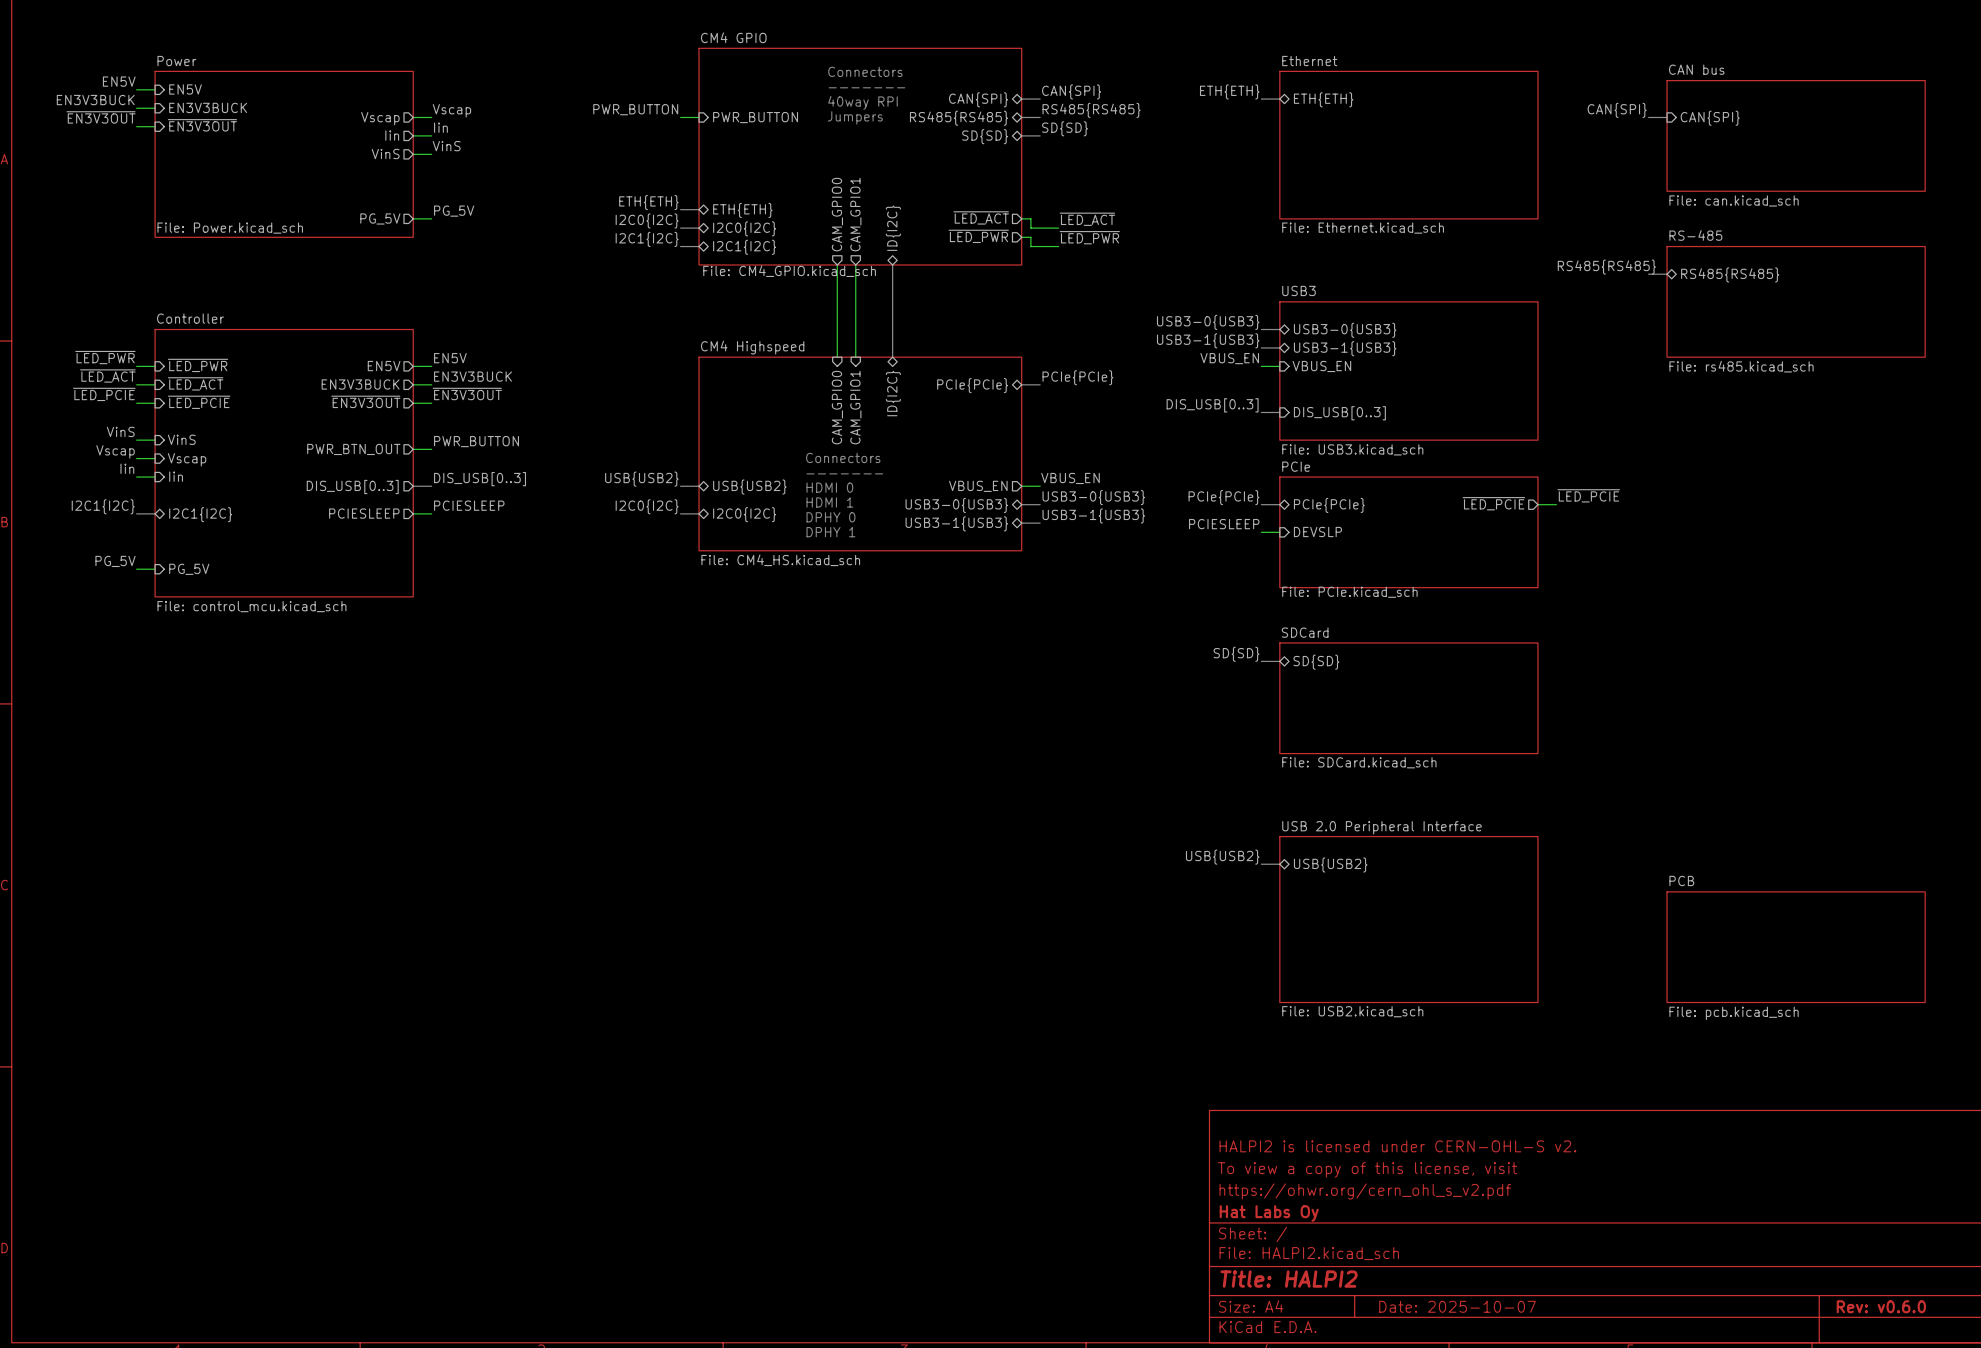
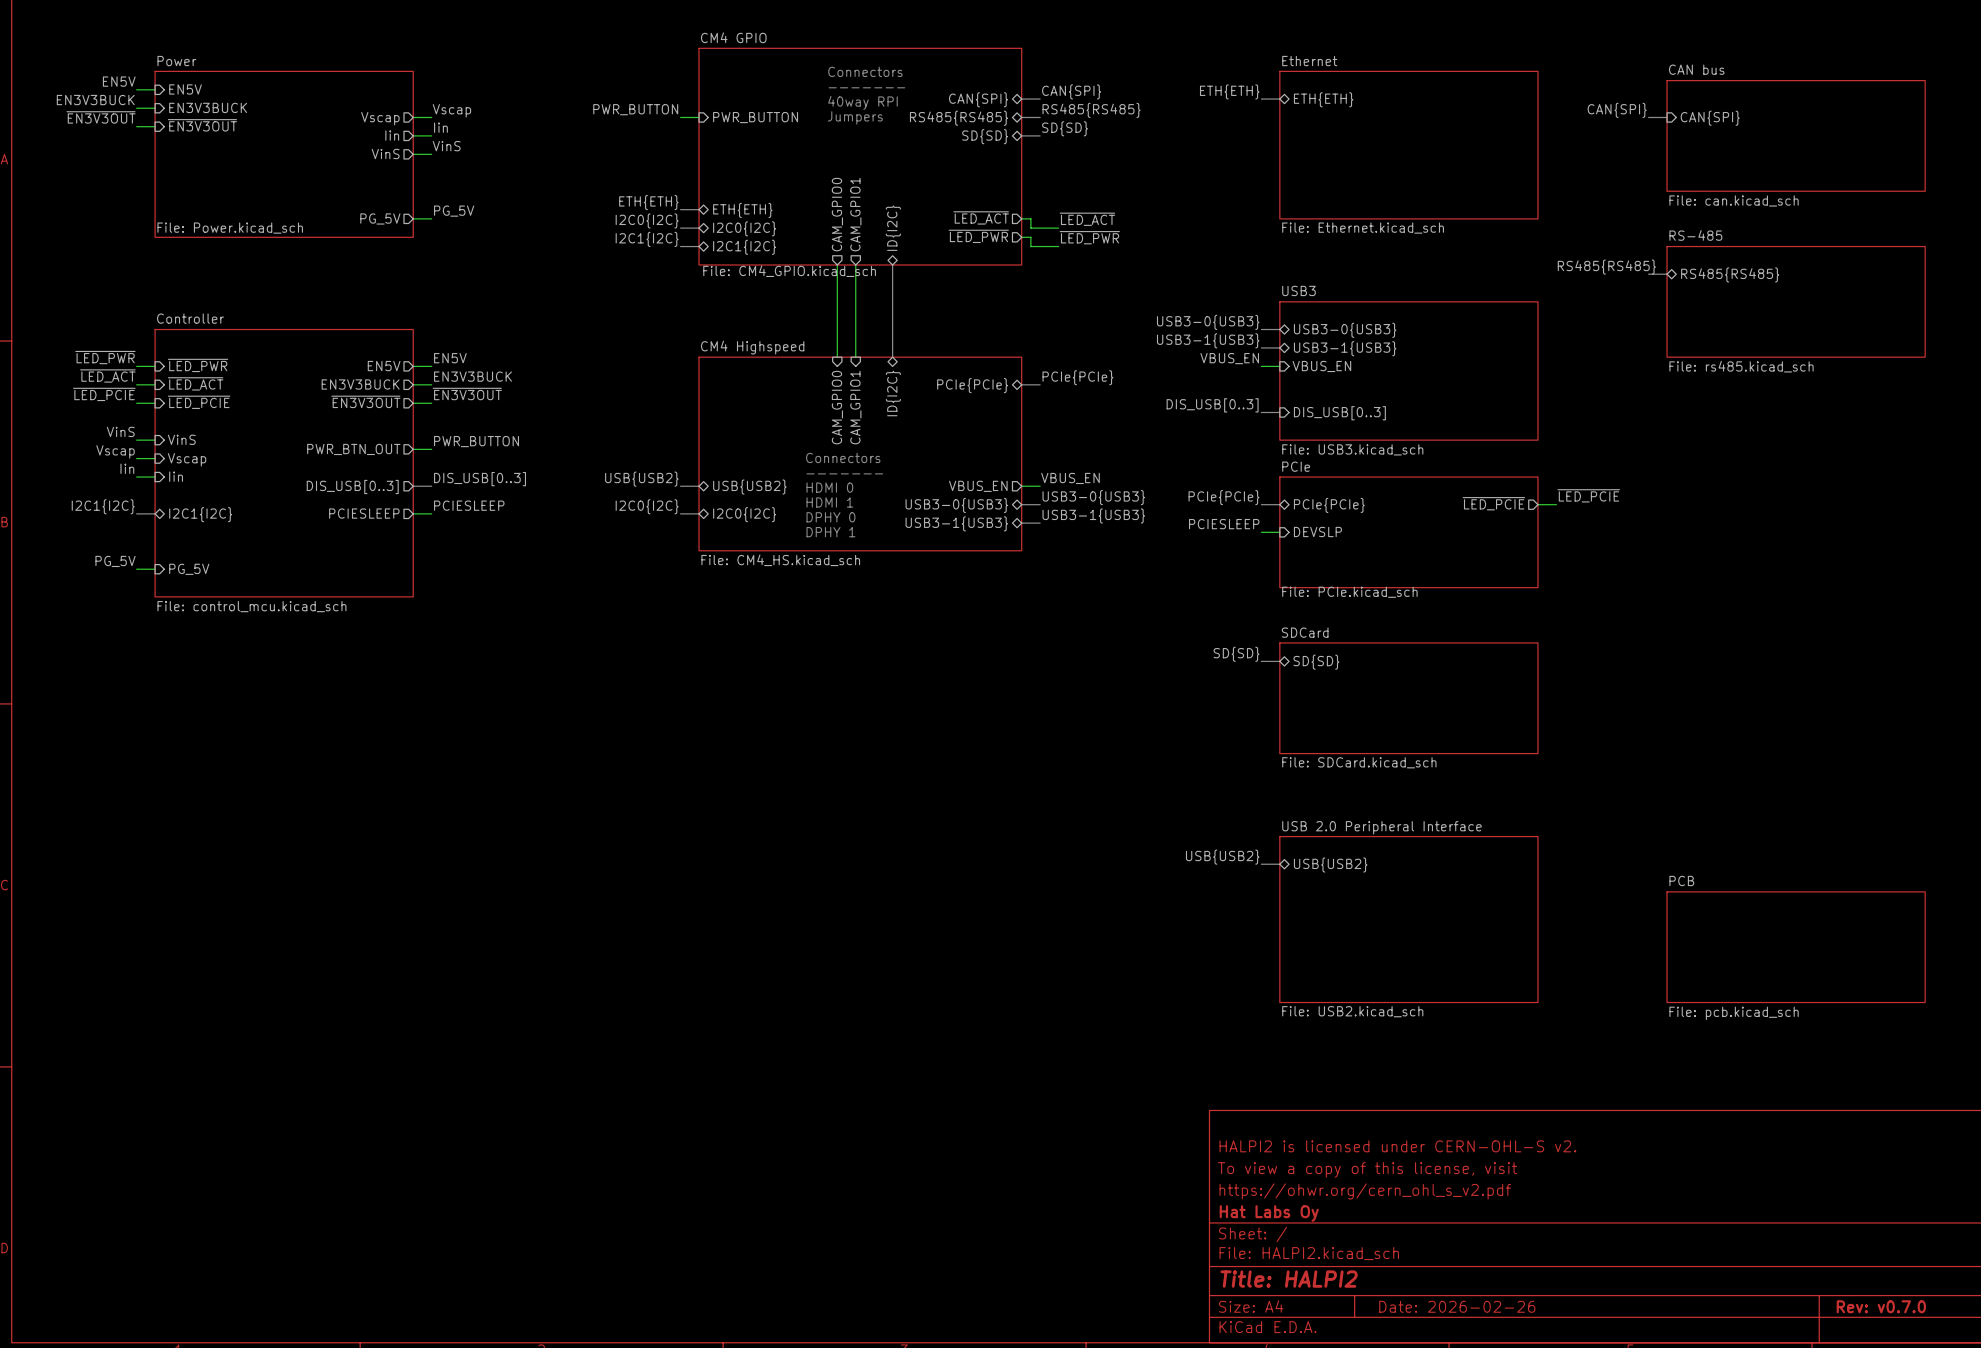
title block: Date: 2025-10-07 (1457, 1306) -> Date: 2026-02-26 (1457, 1306)
title block: Rev: v0.6.0 (1881, 1306) -> Rev: v0.7.0 (1881, 1306)

